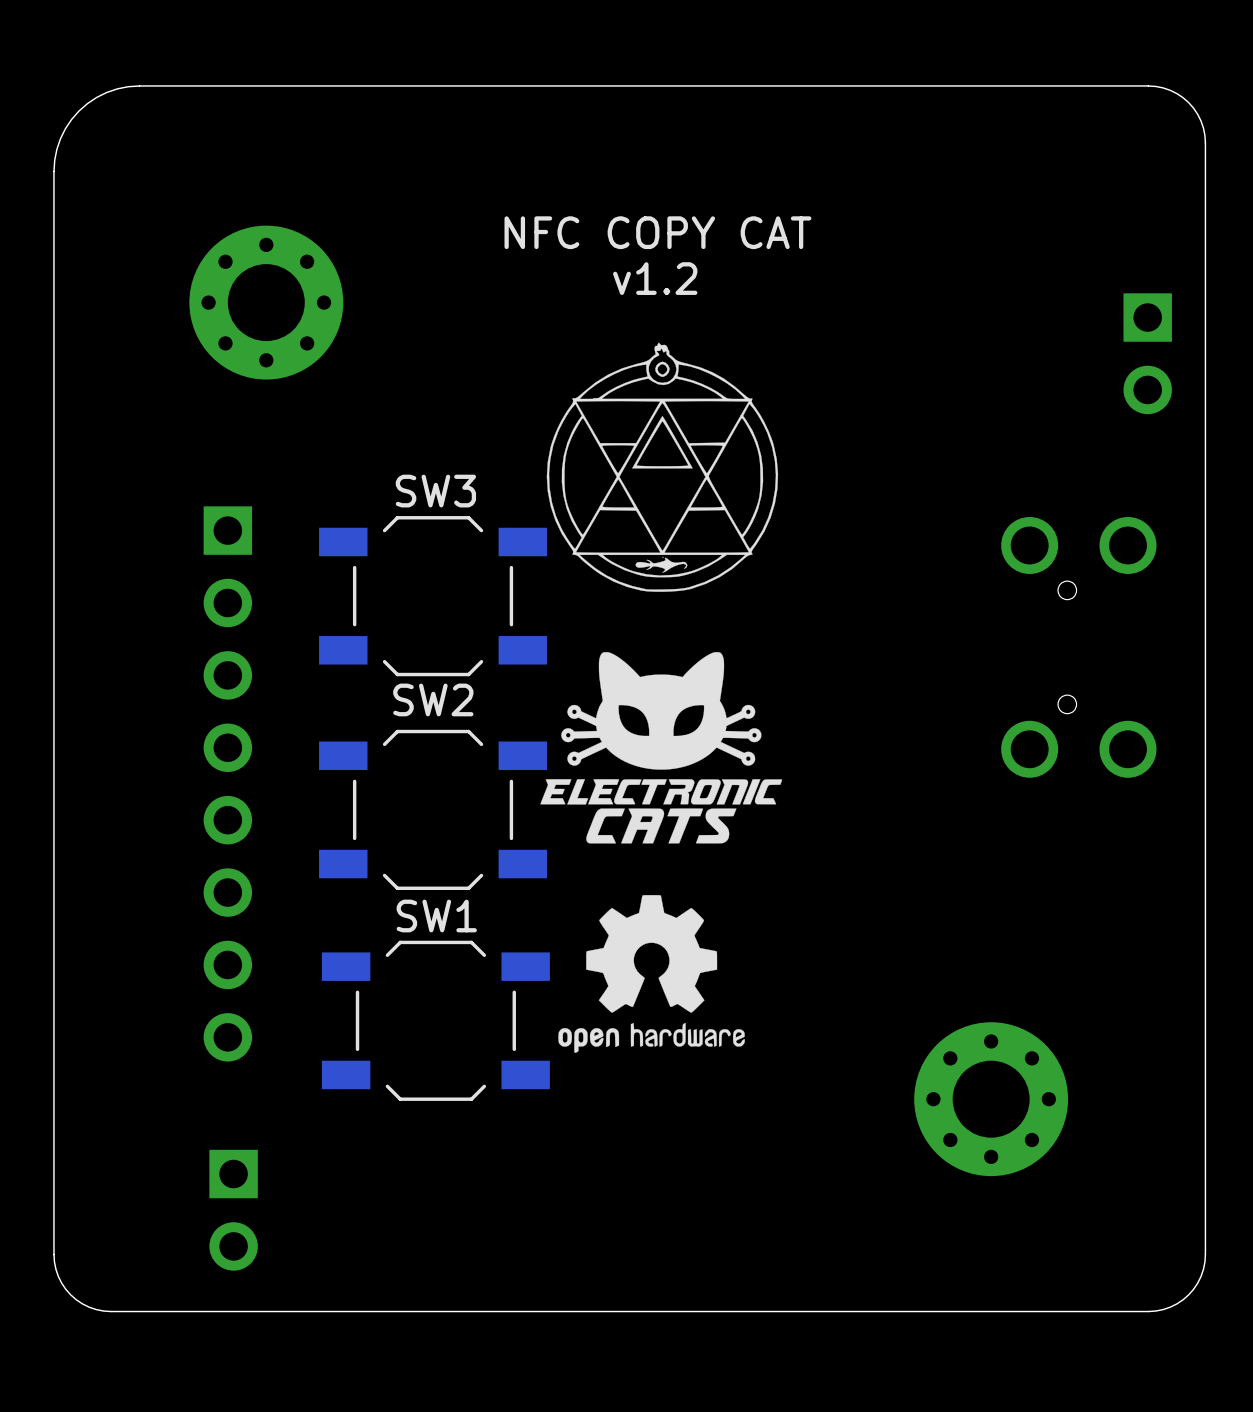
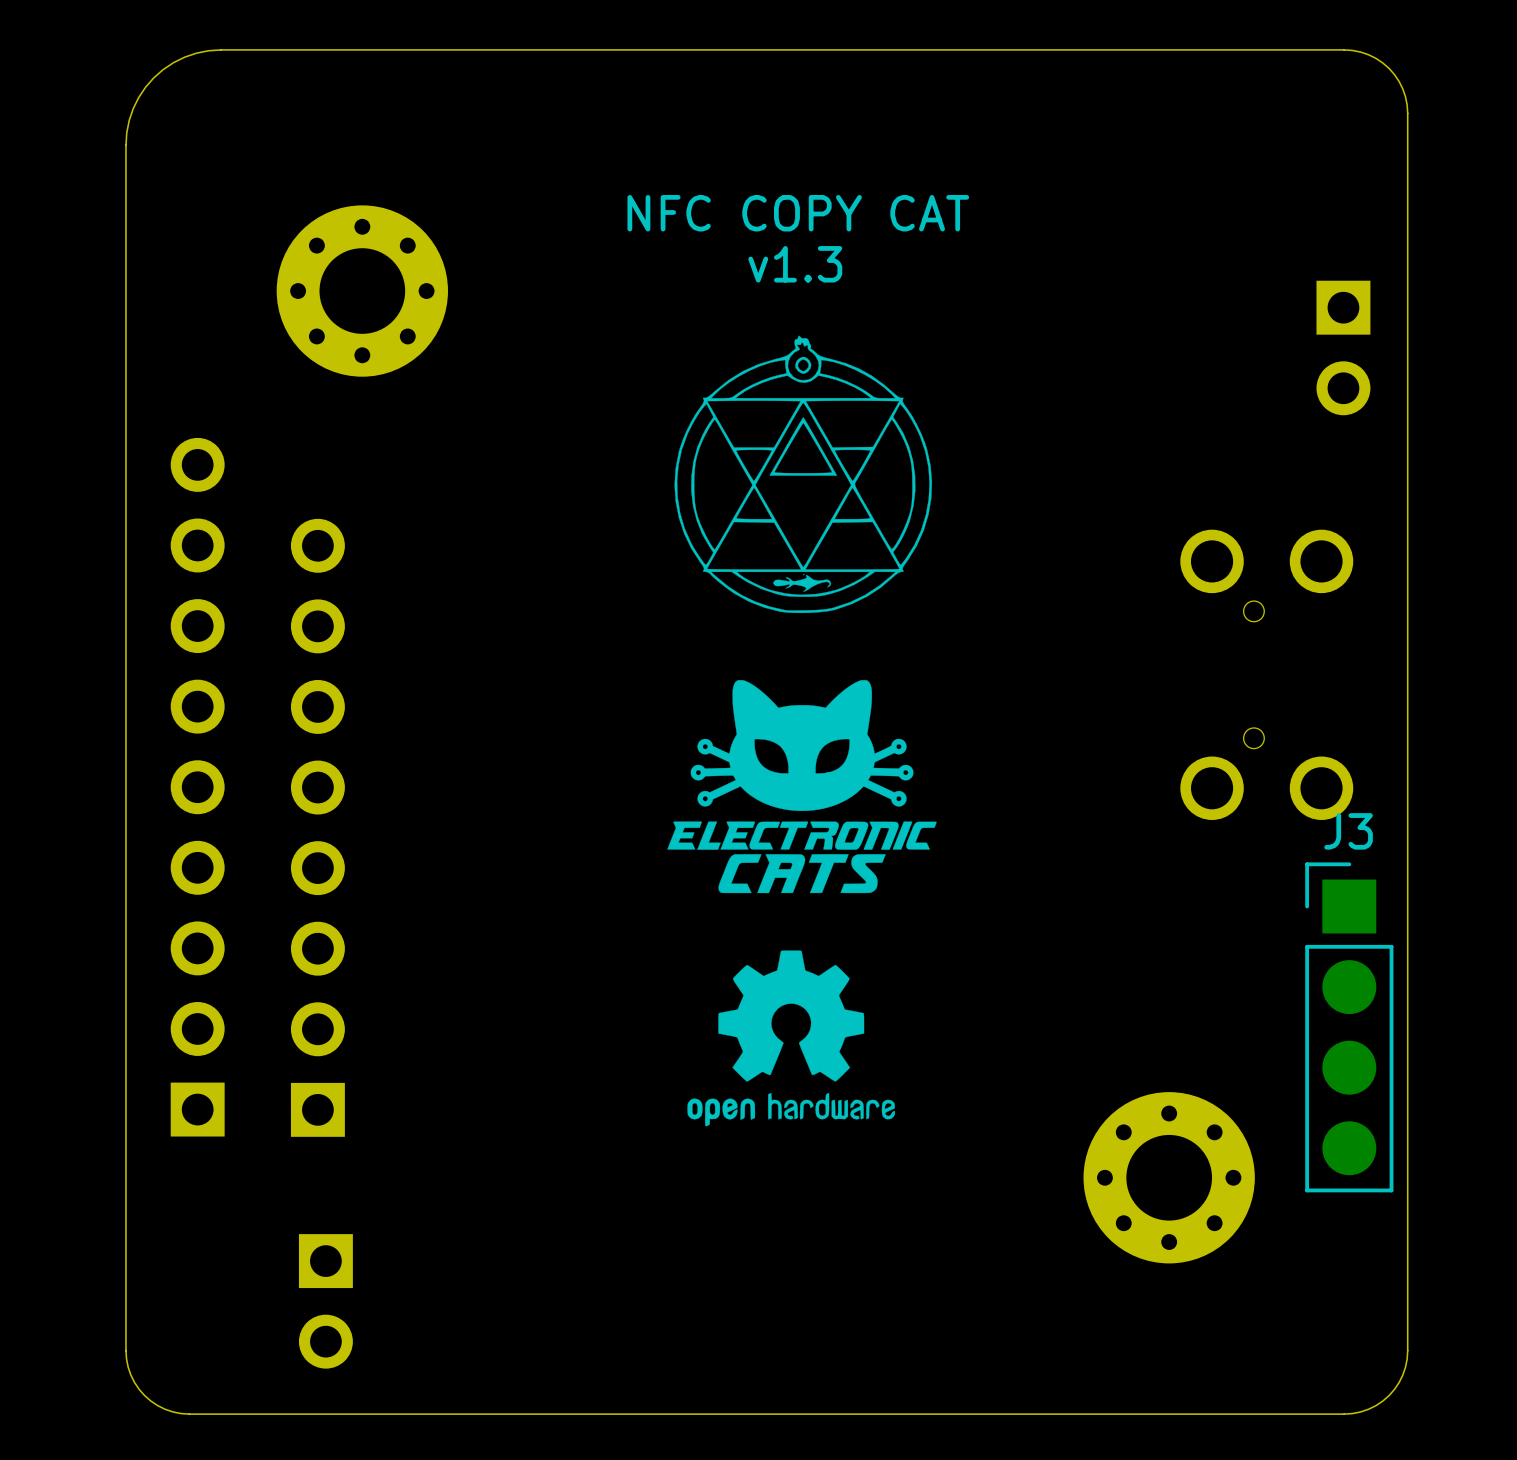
text: v1.2 (655, 278) -> v1.3 (795, 264)
SW3: (433, 596) -> none
part: none -> (197, 787)
part rotation: 0° (227, 783) -> 180° (317, 827)
SW2: (433, 809) -> none
J3: none -> (1349, 1027)
SW1: (435, 1020) -> none

